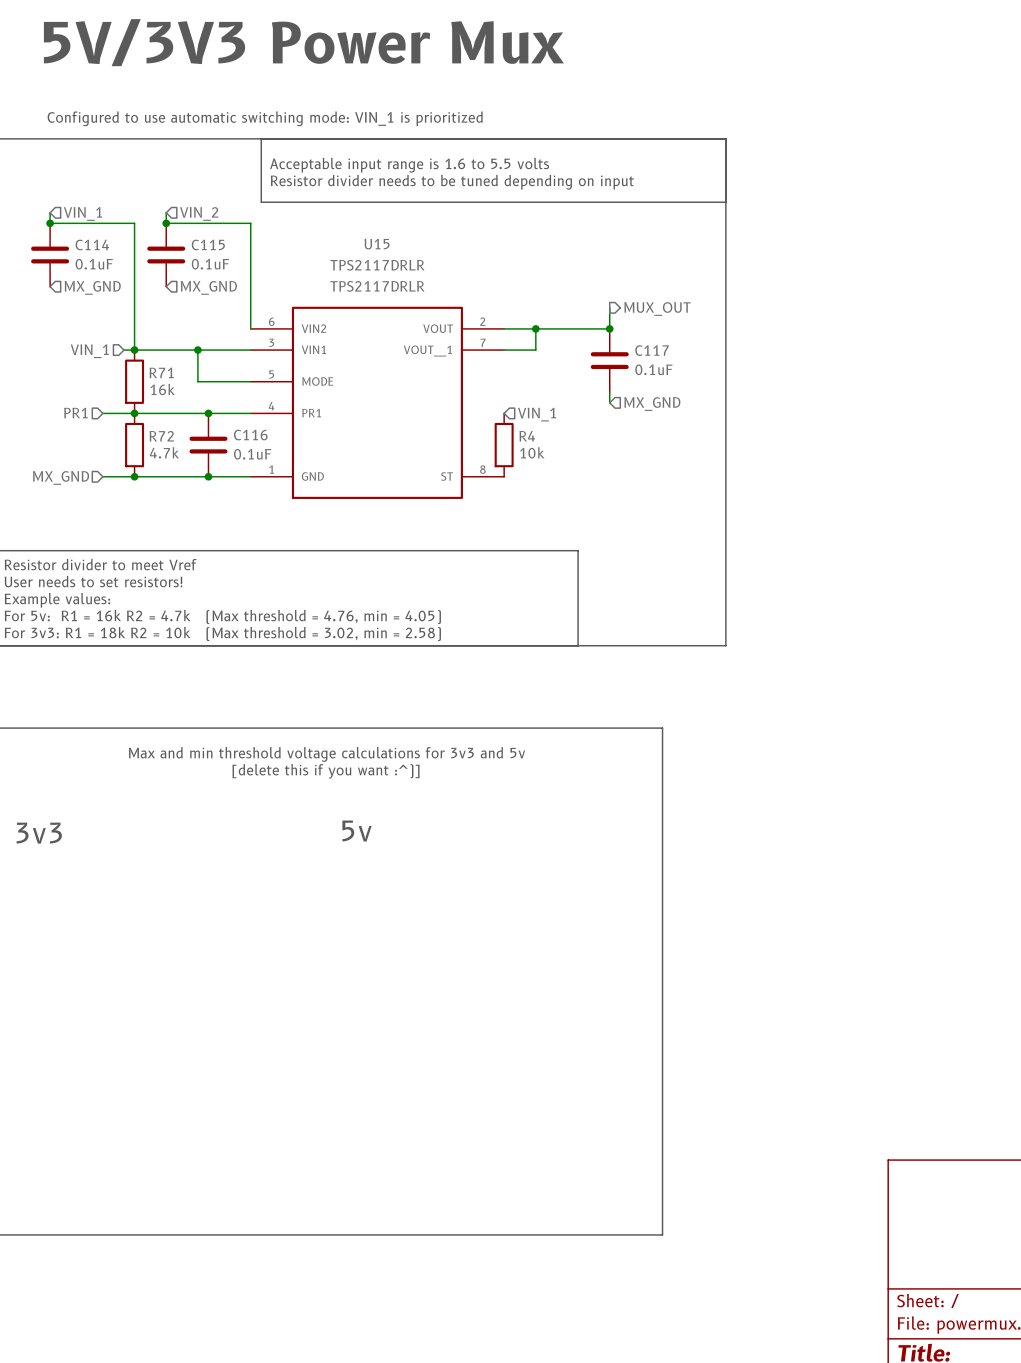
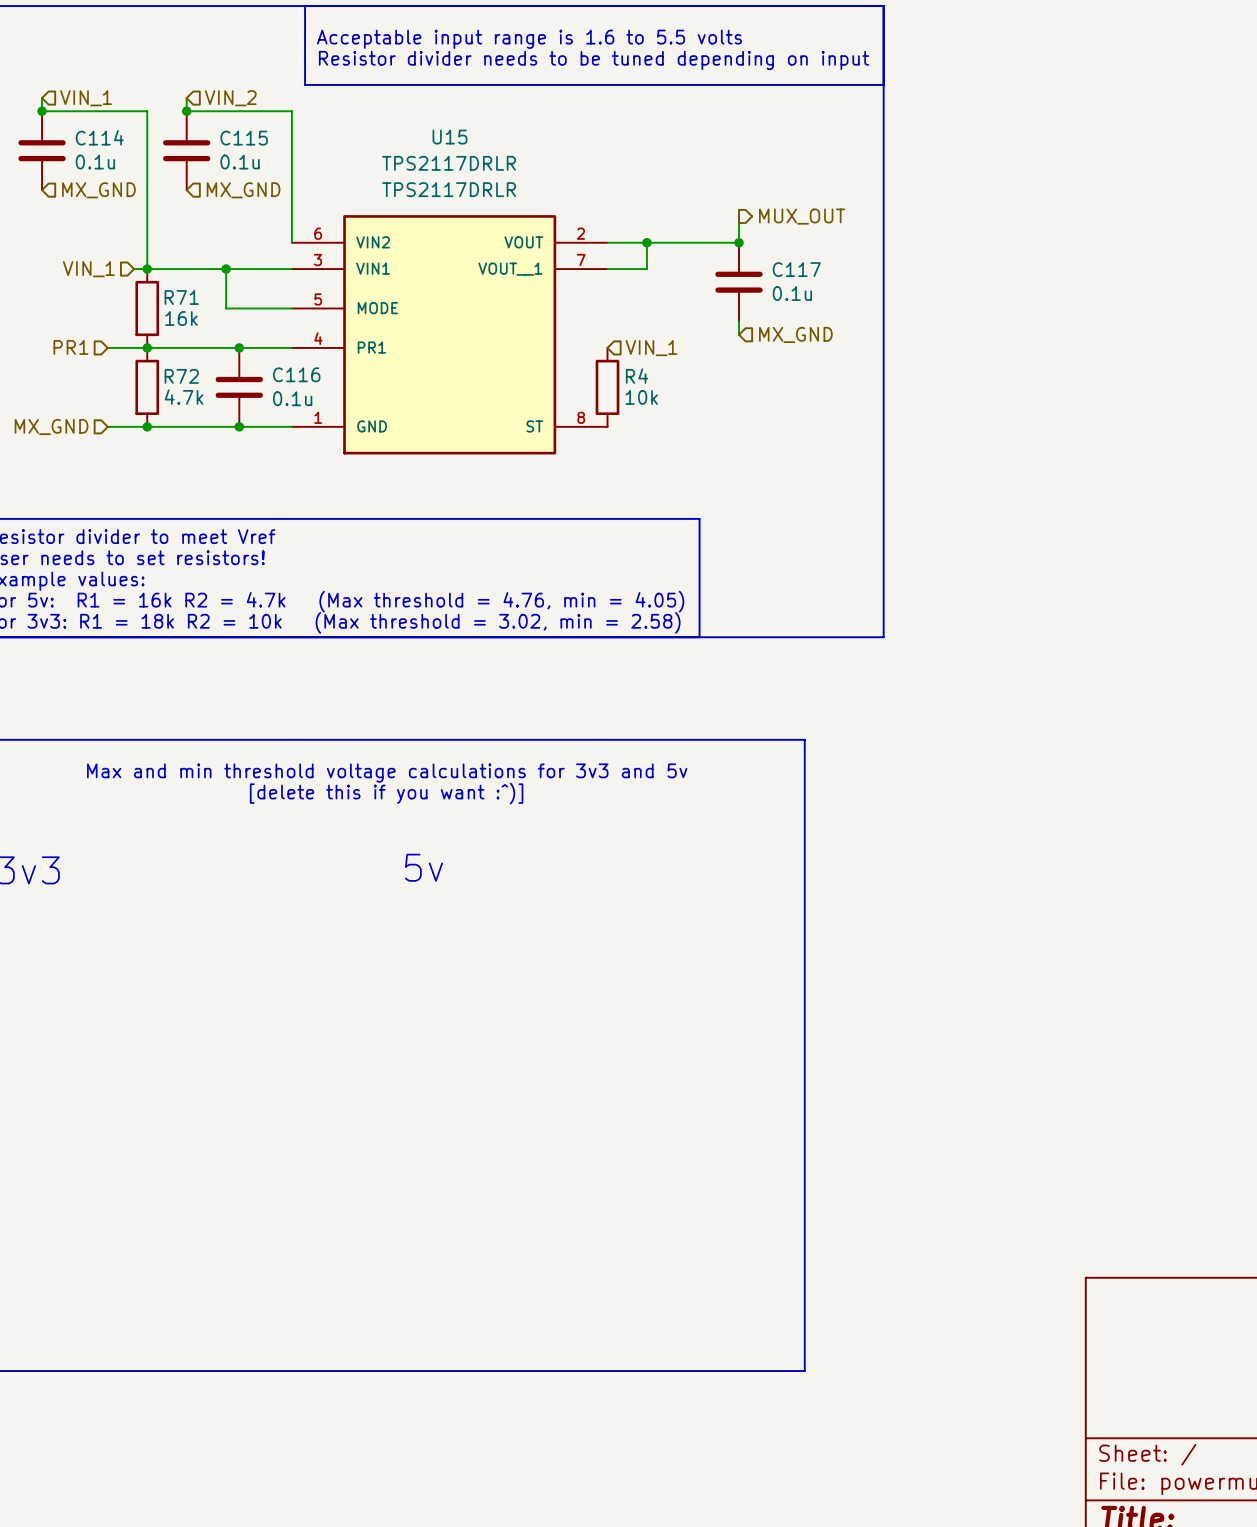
C114 value: 0.1uF (94, 264) -> 0.1u (95, 162)
C115 value: 0.1uF (210, 264) -> 0.1u (240, 162)
C117 value: 0.1uF (653, 369) -> 0.1u (792, 293)
C116 value: 0.1uF (252, 454) -> 0.1u (292, 398)

